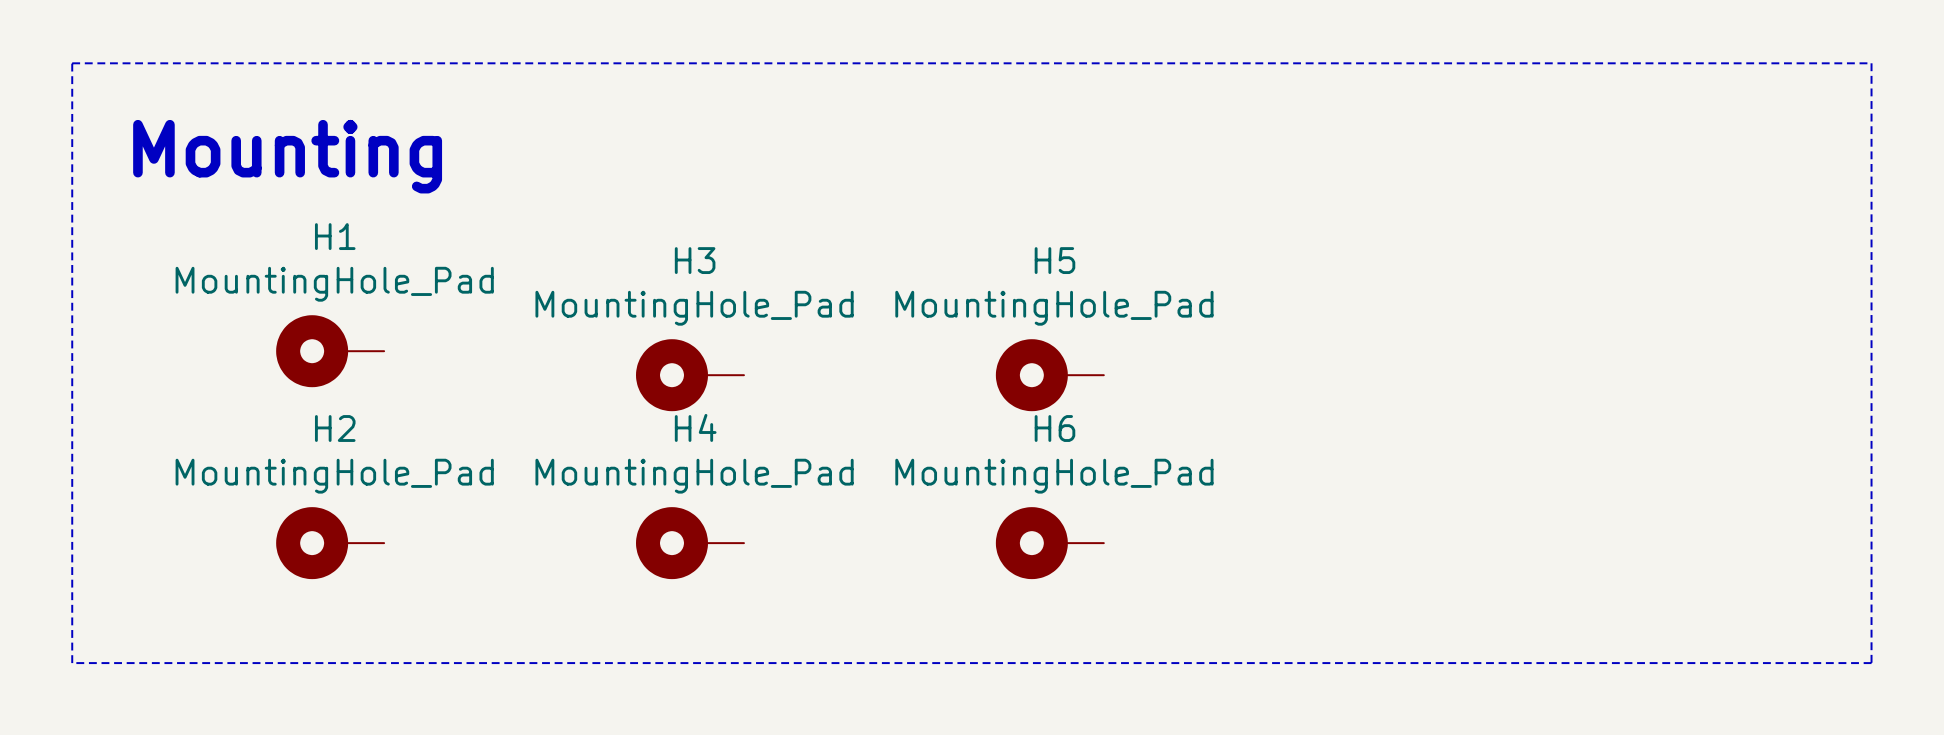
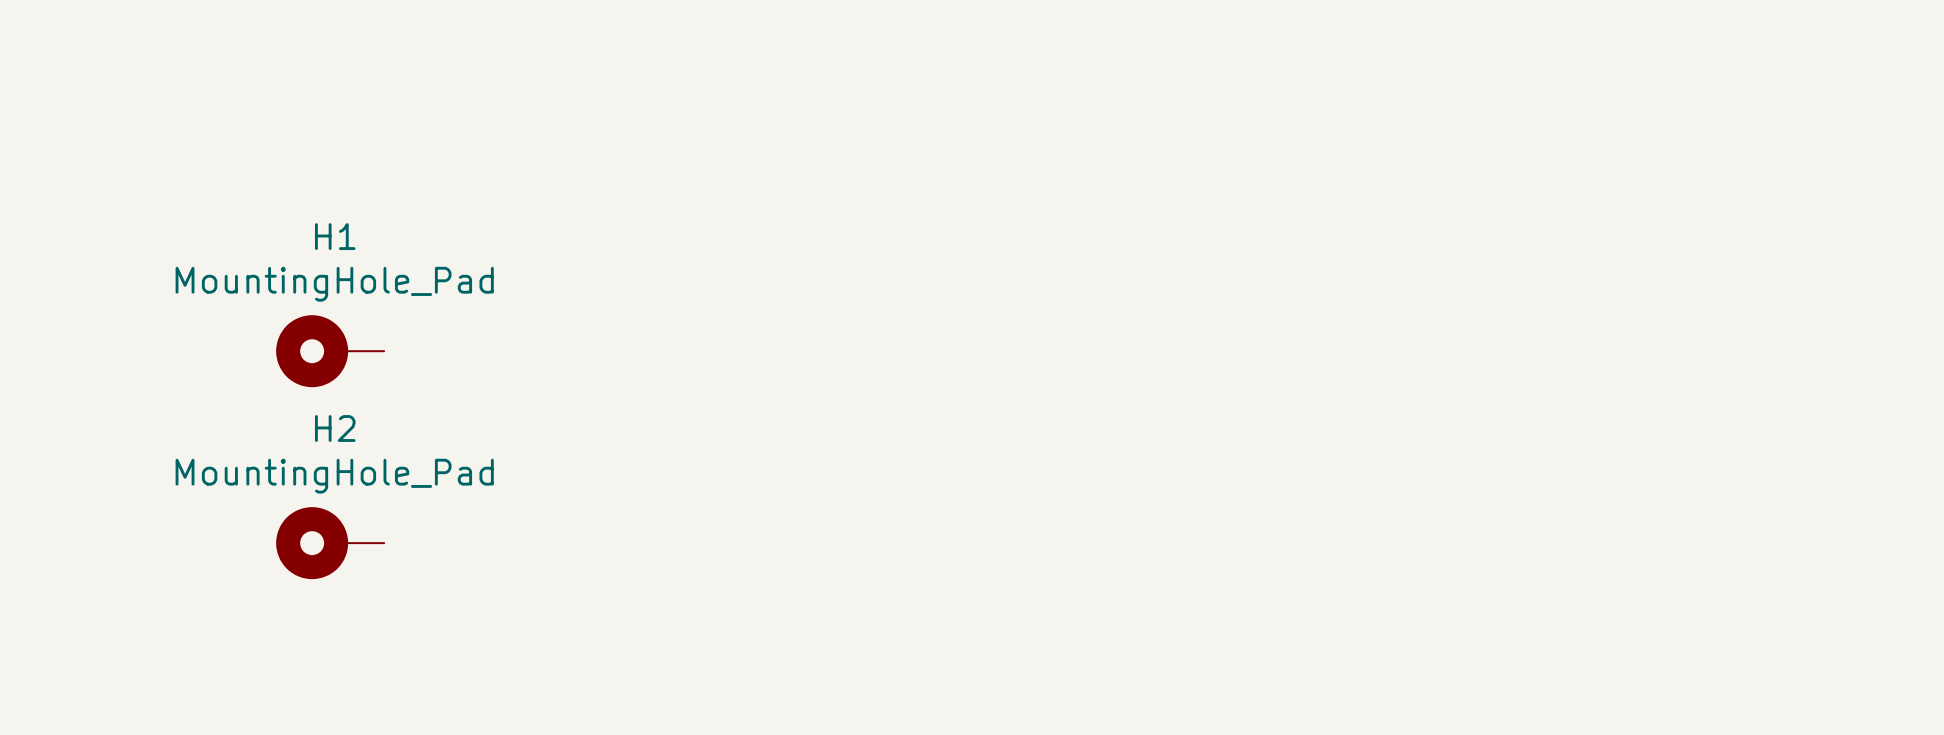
line: (72, 63) (72, 663) (1871, 663) (1871, 63) (72, 63) -> none
text: Mounting (287, 156) -> none
H3: MountingHole_Pad (689, 375) -> none
H5: MountingHole_Pad (1049, 375) -> none
H4: MountingHole_Pad (689, 543) -> none
H6: MountingHole_Pad (1049, 543) -> none

